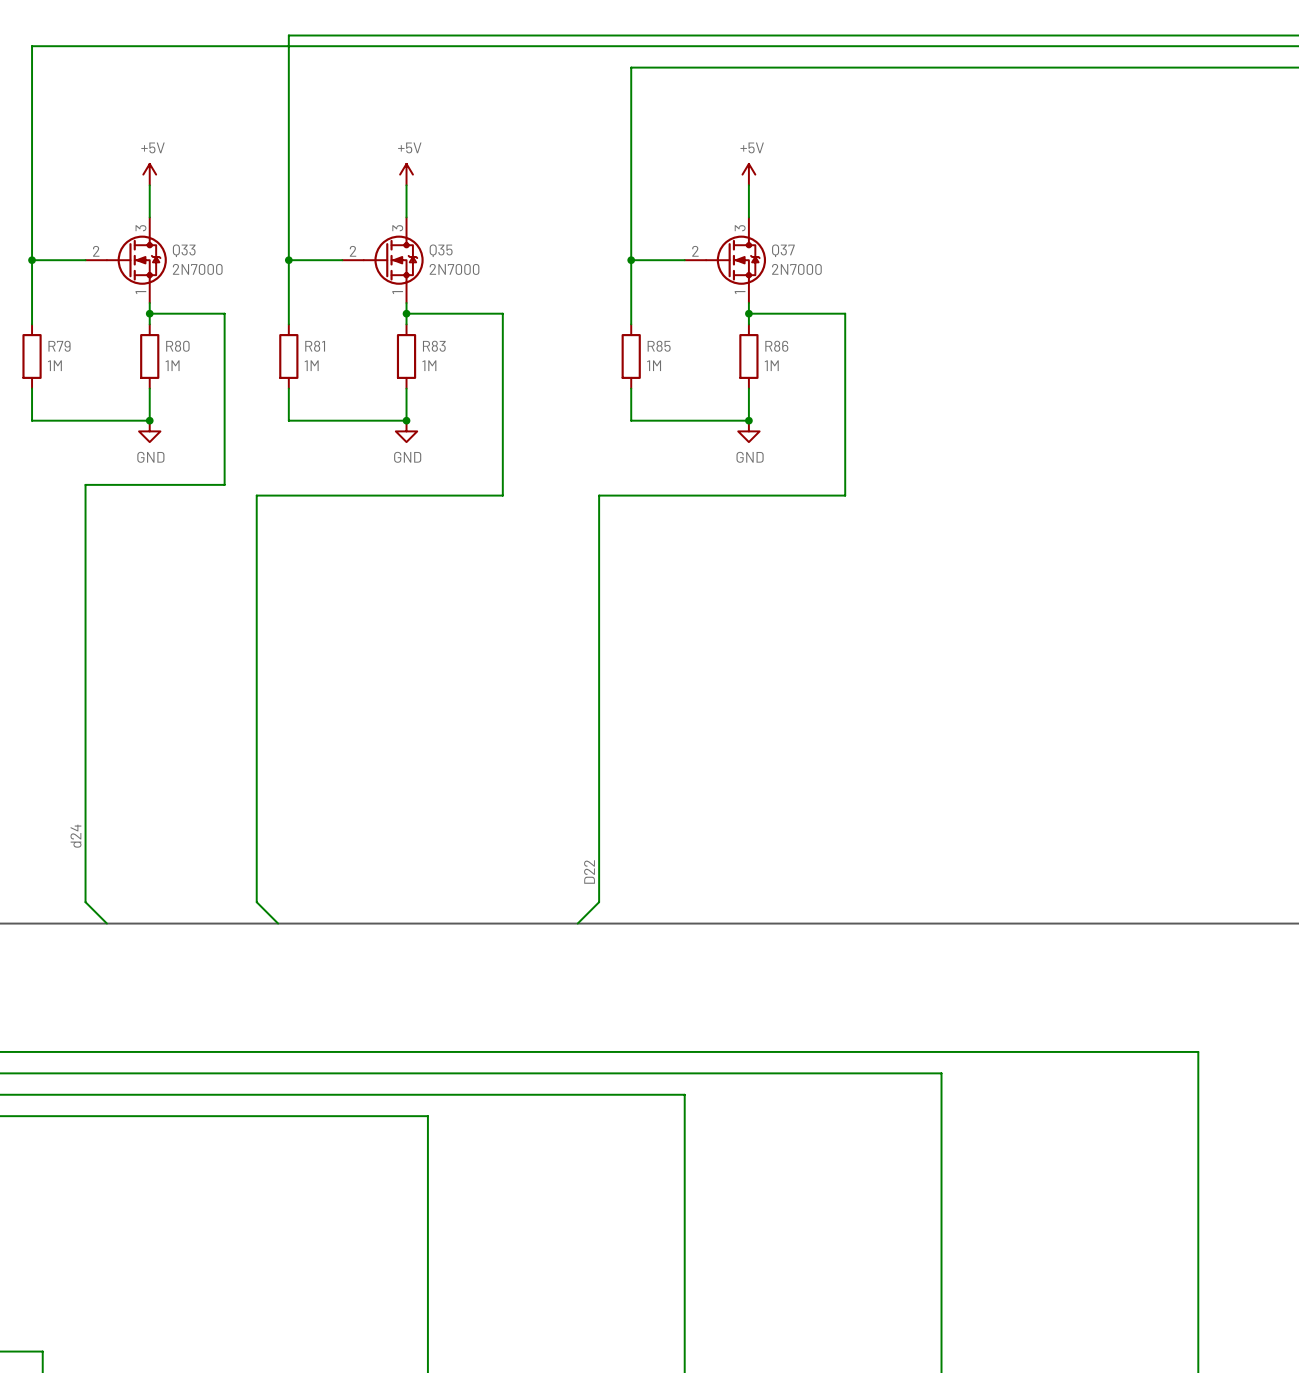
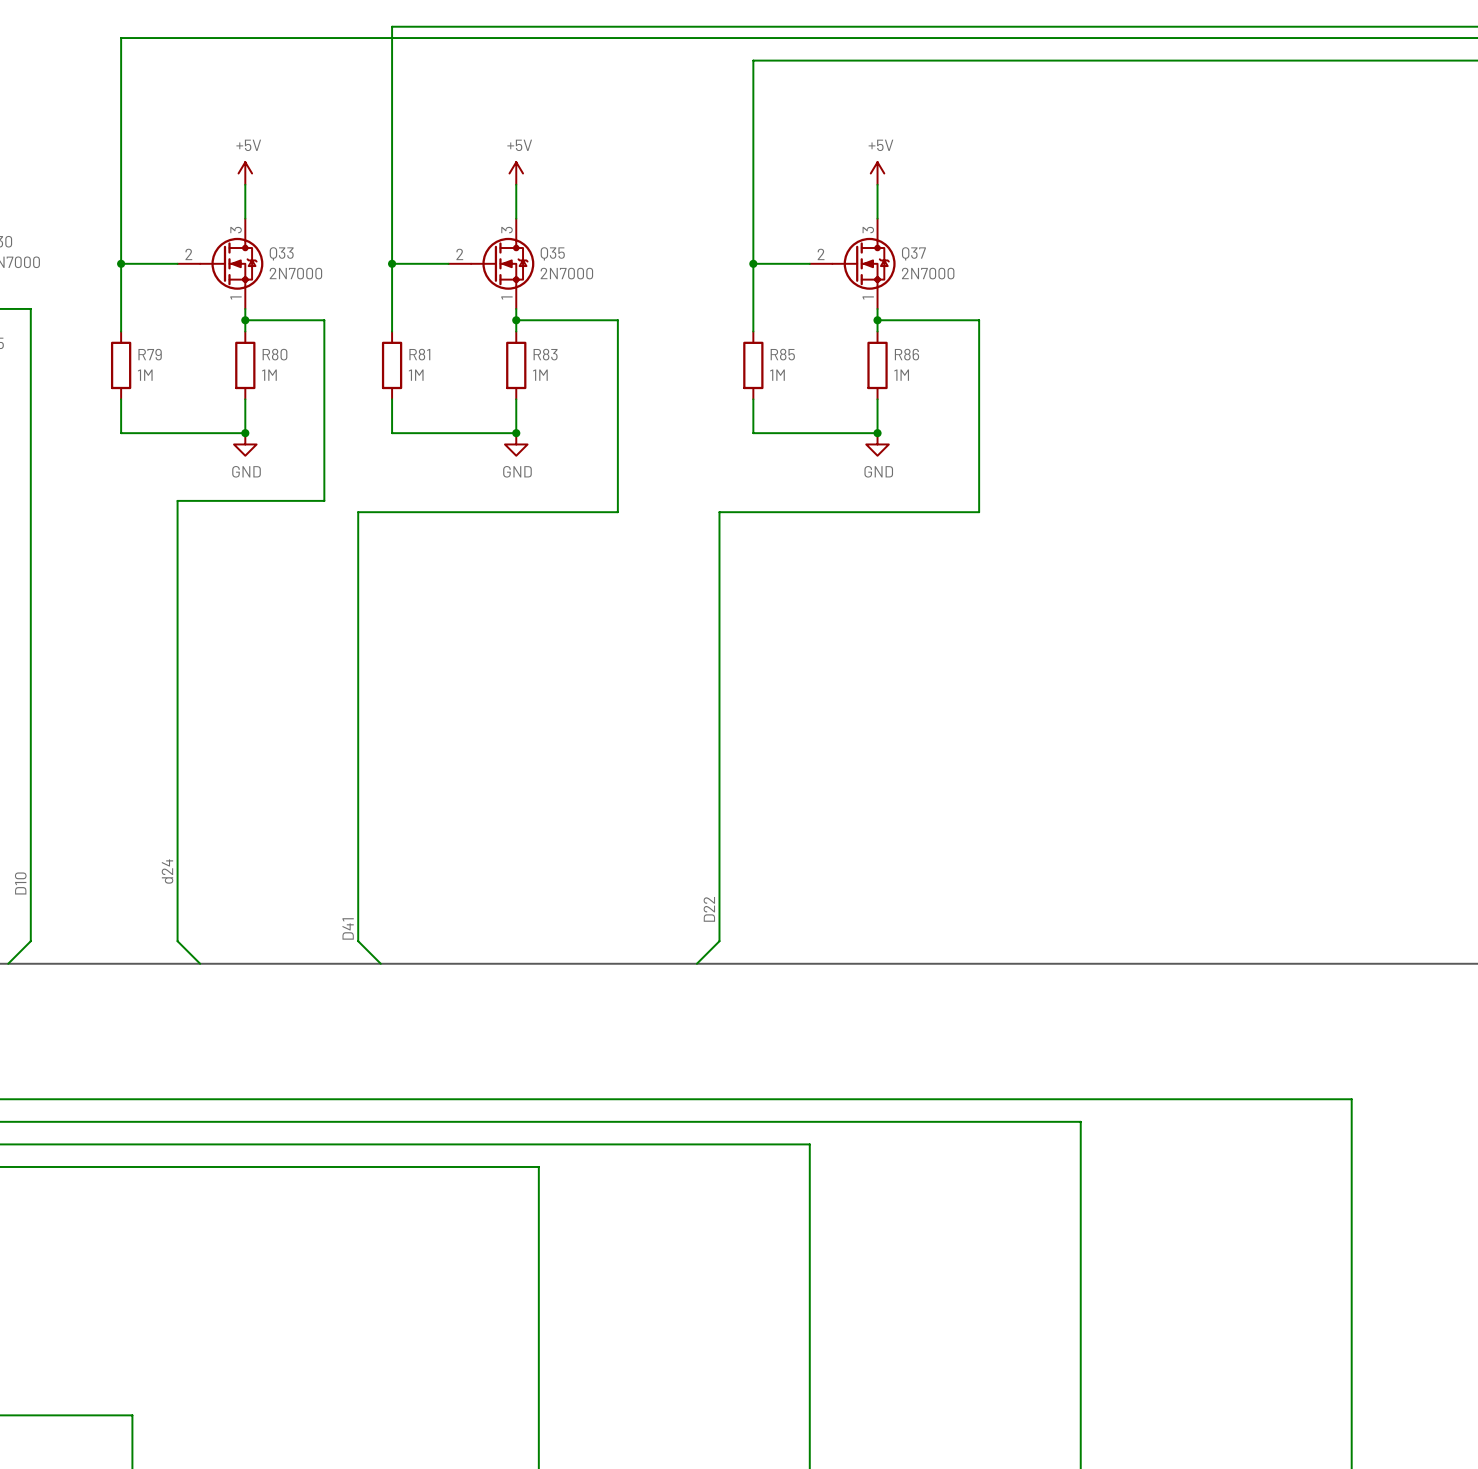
label: none -> D41 (348, 928)

